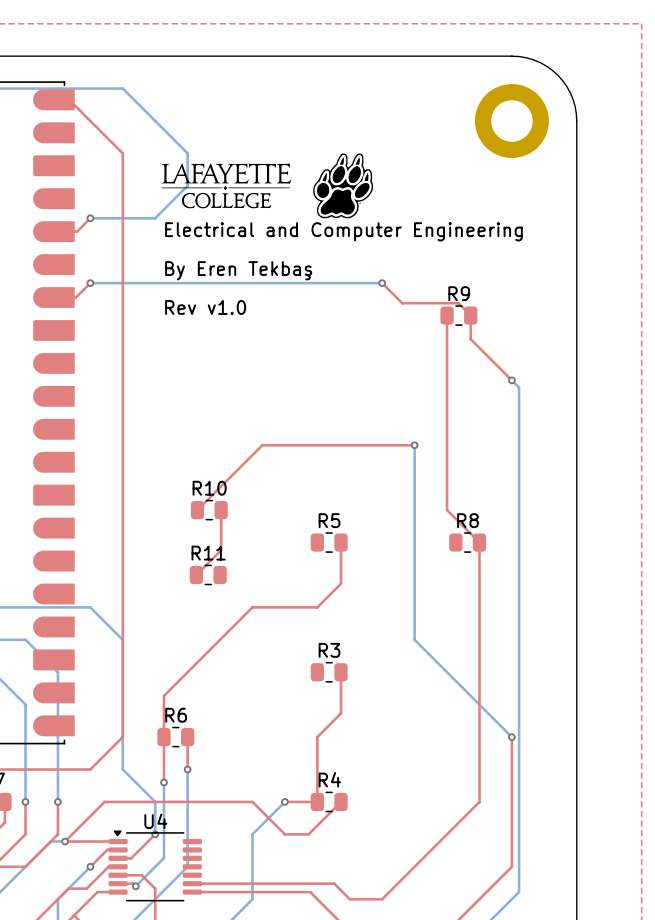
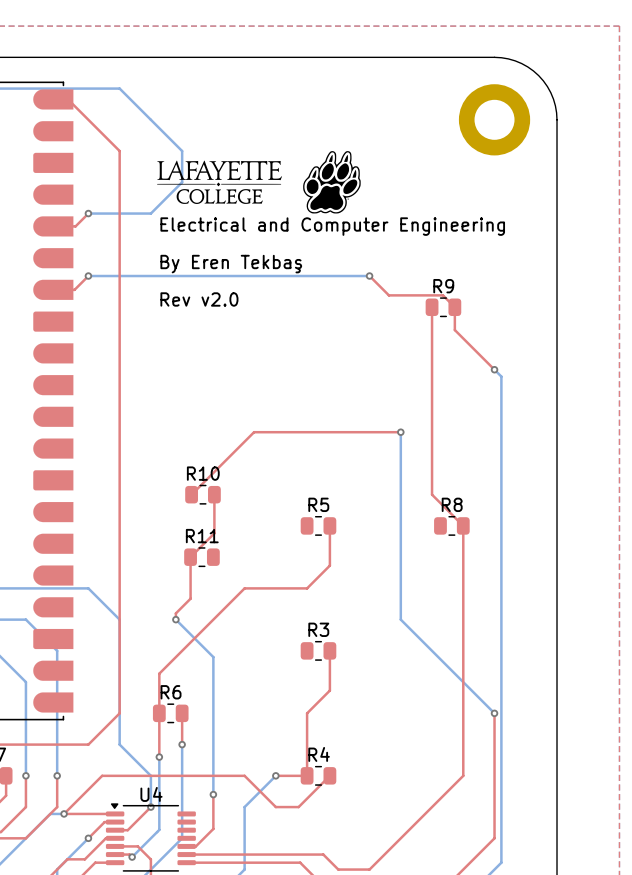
text: Rev v1.0 (205, 307) -> Rev v2.0 (199, 299)
top track: none -> (190, 557) (190, 598) (175, 613) (175, 619)
bottom track: none -> (175, 619) (213, 657) (213, 794)
via: none -> (175, 619)
top track: none -> (213, 794) (213, 828) (195, 846) (186, 846)
via: none -> (213, 794)

